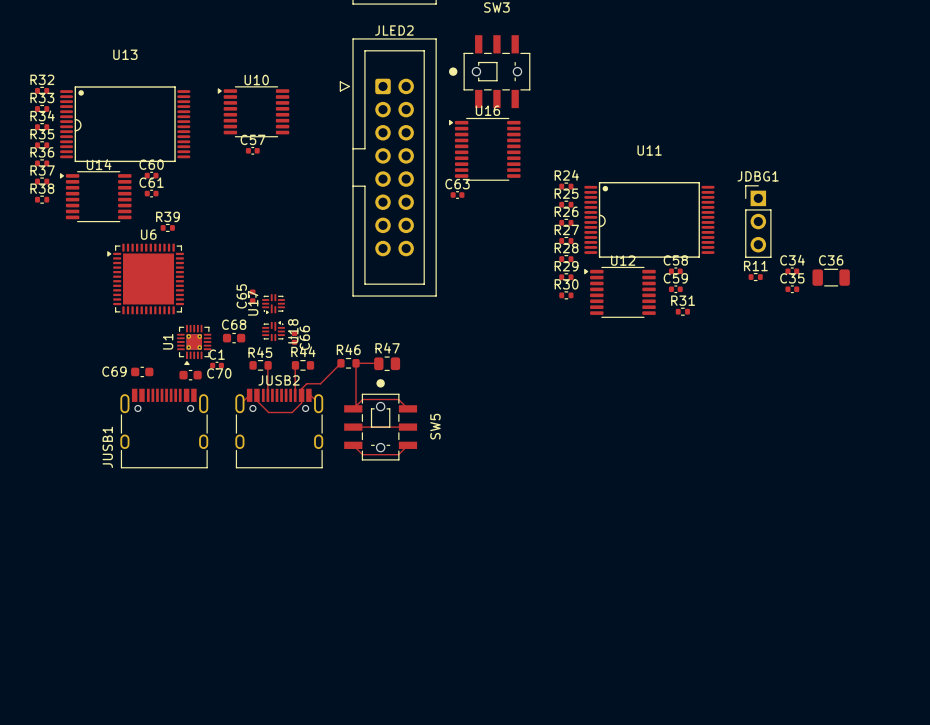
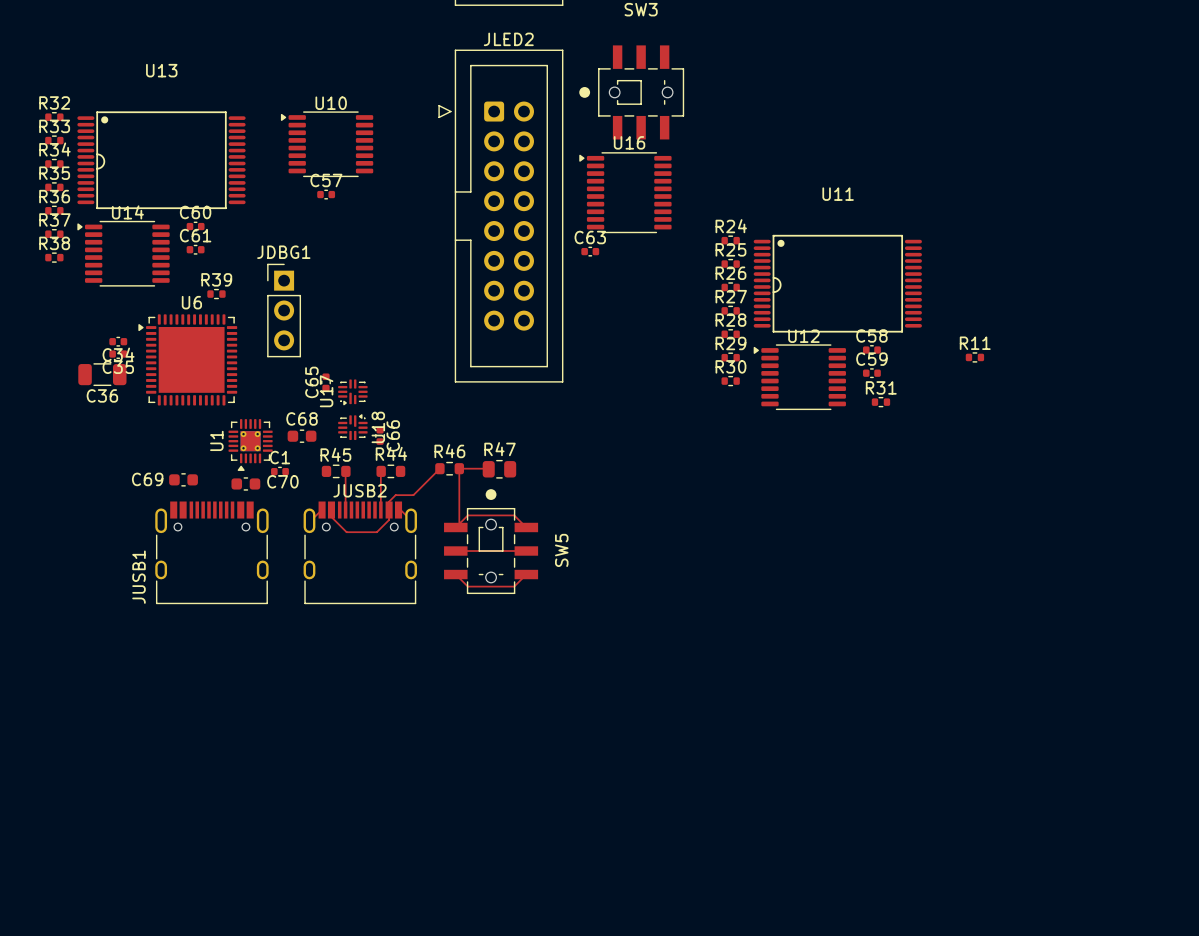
JDBG1 position: (758, 221) -> (284, 310)
C34 name position: C34 (792, 260) -> C34 (118, 354)
C36 name position: C36 (831, 260) -> C36 (102, 395)
C34 position: (792, 271) -> (118, 341)
C36 position: (831, 277) -> (102, 374)
C35 name position: C35 (792, 278) -> C35 (118, 367)
C35 position: (792, 289) -> (118, 354)

